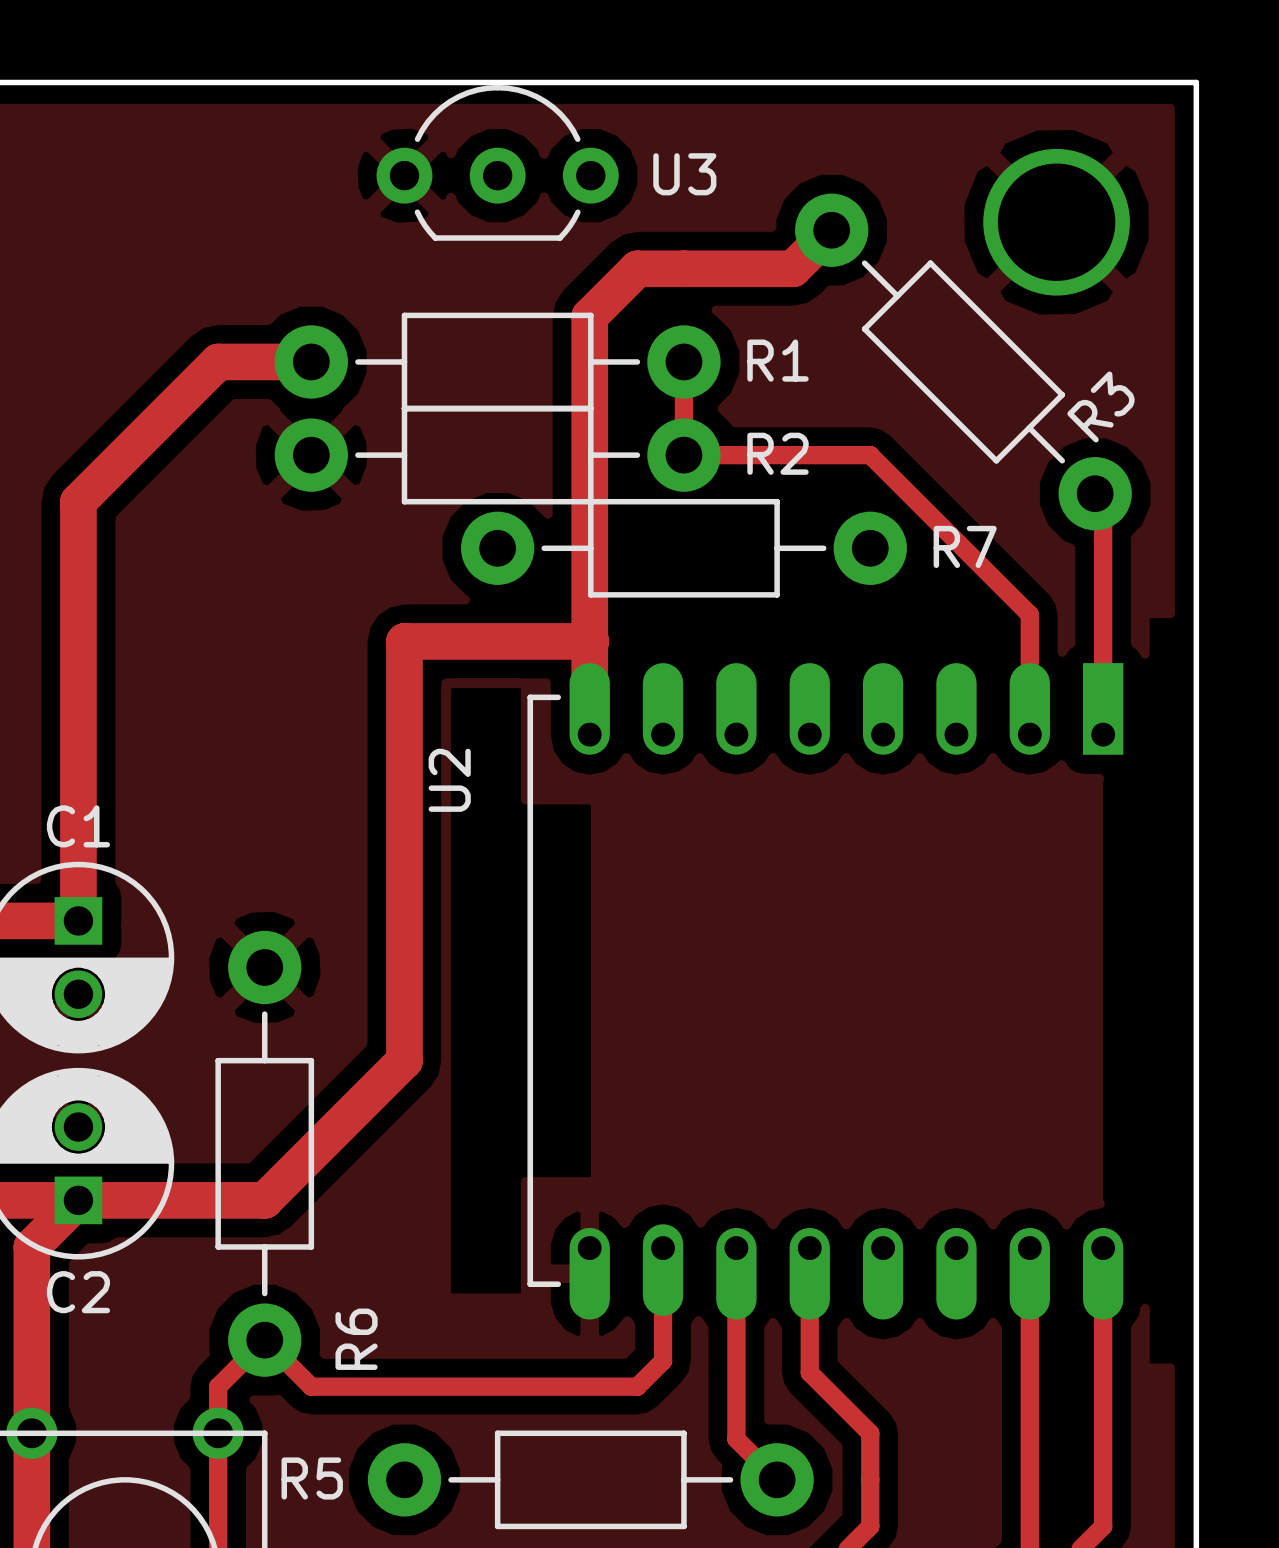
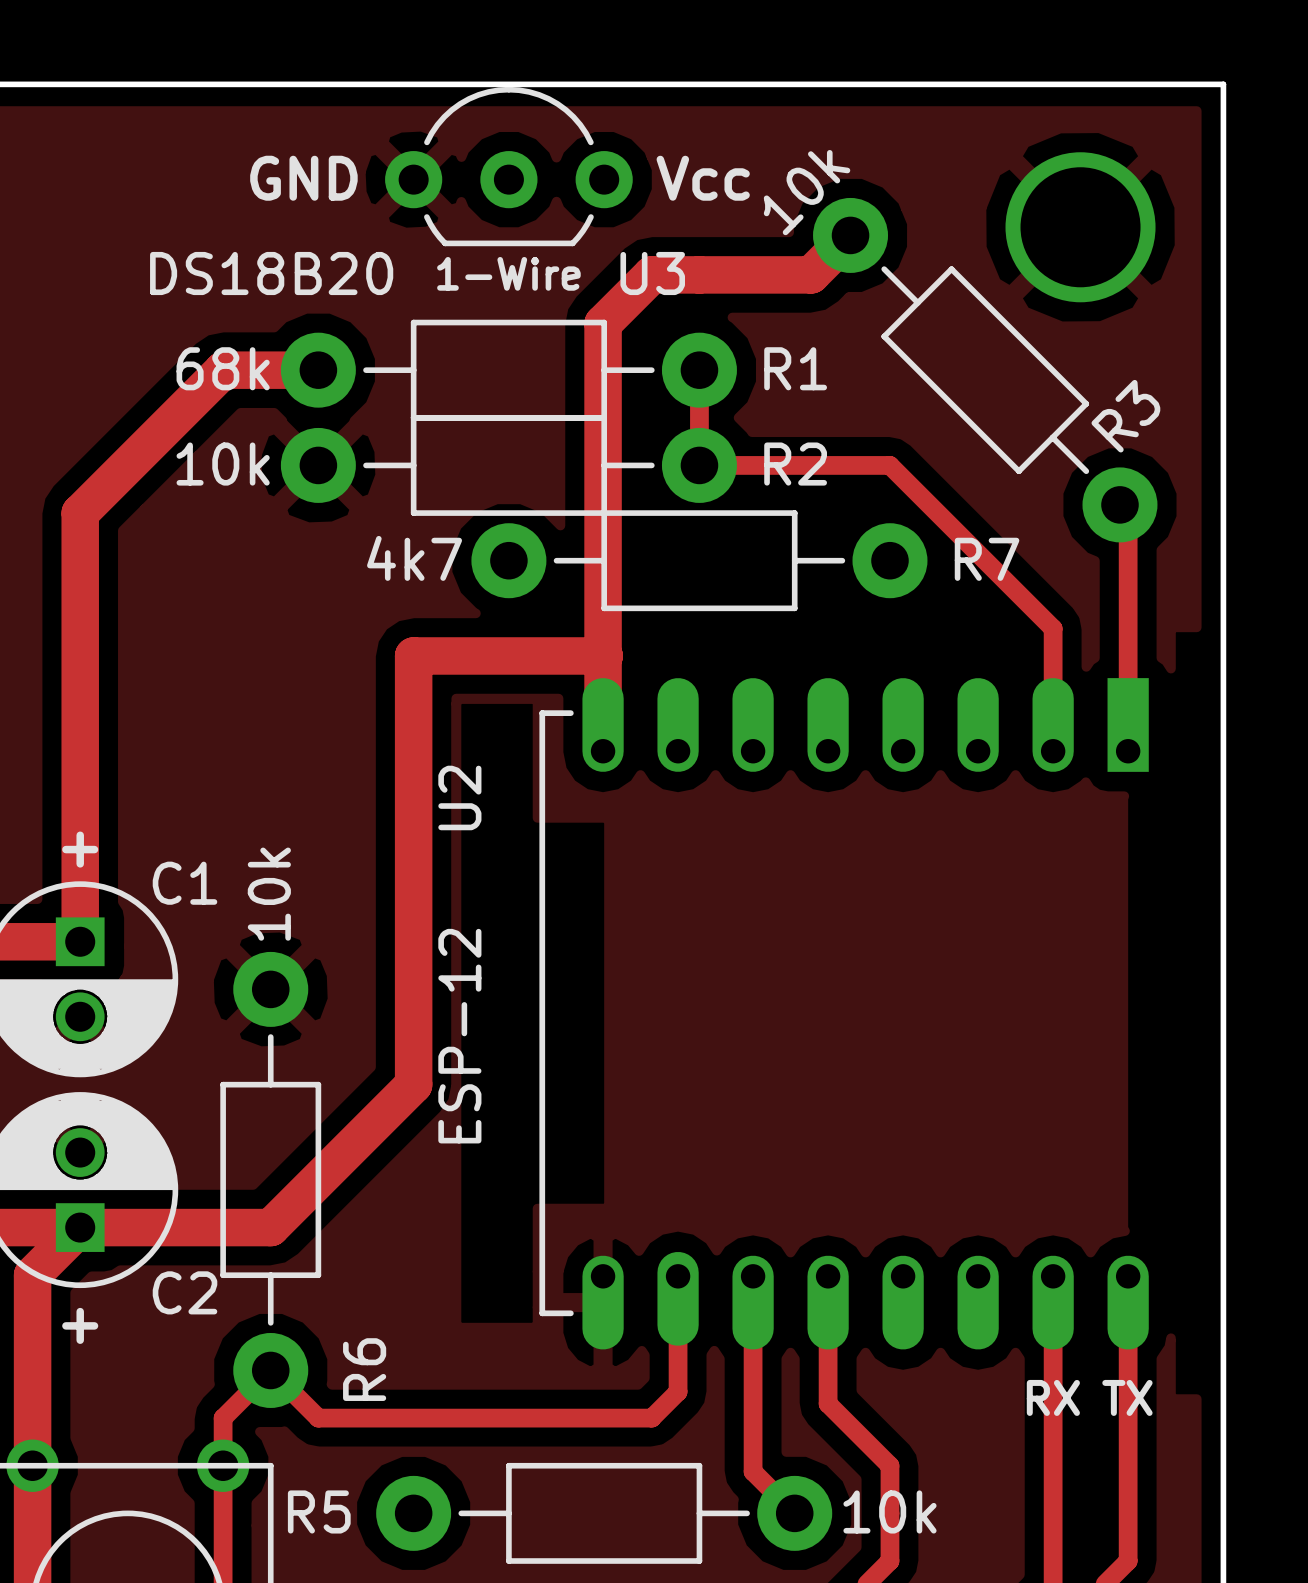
text: none -> GND (303, 178)
U3 name position: U3 (684, 174) -> U3 (652, 273)
text: none -> Vcc (703, 178)
R3 value: none -> 10k (807, 192)
U3 value: none -> DS18B20 (271, 273)
text: none -> 1-Wire (508, 273)
R1 value: none -> 68k (223, 368)
R2 value: none -> 10k (223, 464)
R7 value: none -> 4k7 (414, 558)
C1 name position: C1 (78, 826) -> C1 (185, 883)
text: none -> + (80, 849)
R6 value: none -> 10k (269, 894)
U2 value: none -> ESP-12 (459, 1036)
C2 name position: C2 (78, 1292) -> C2 (185, 1292)
text: none -> + (80, 1325)
text: none -> RX (1053, 1397)
text: none -> TX (1127, 1397)
R5 value: none -> 10k (889, 1511)

